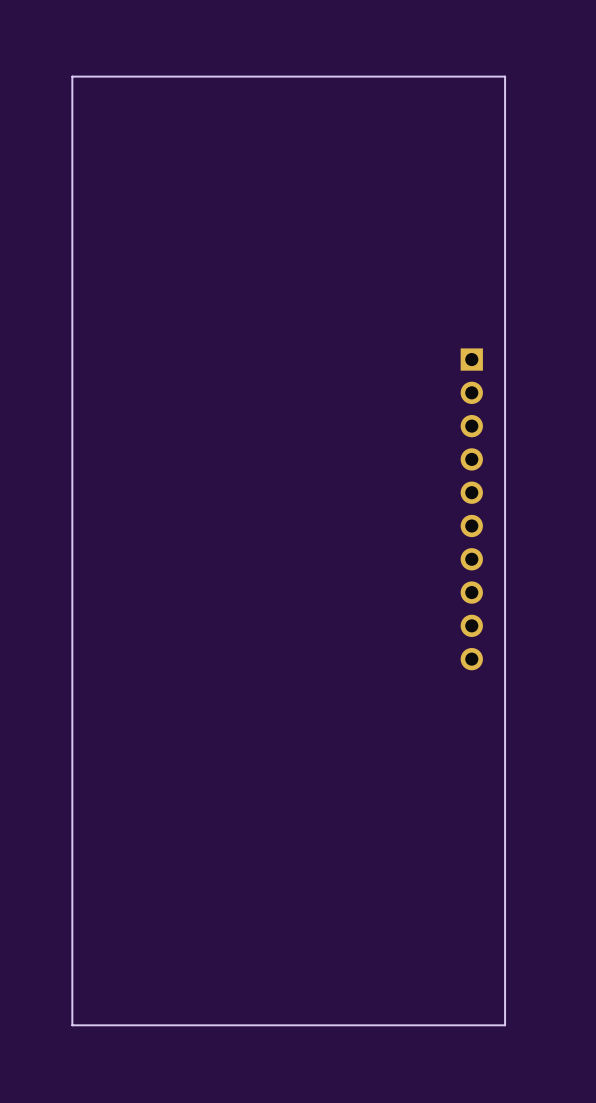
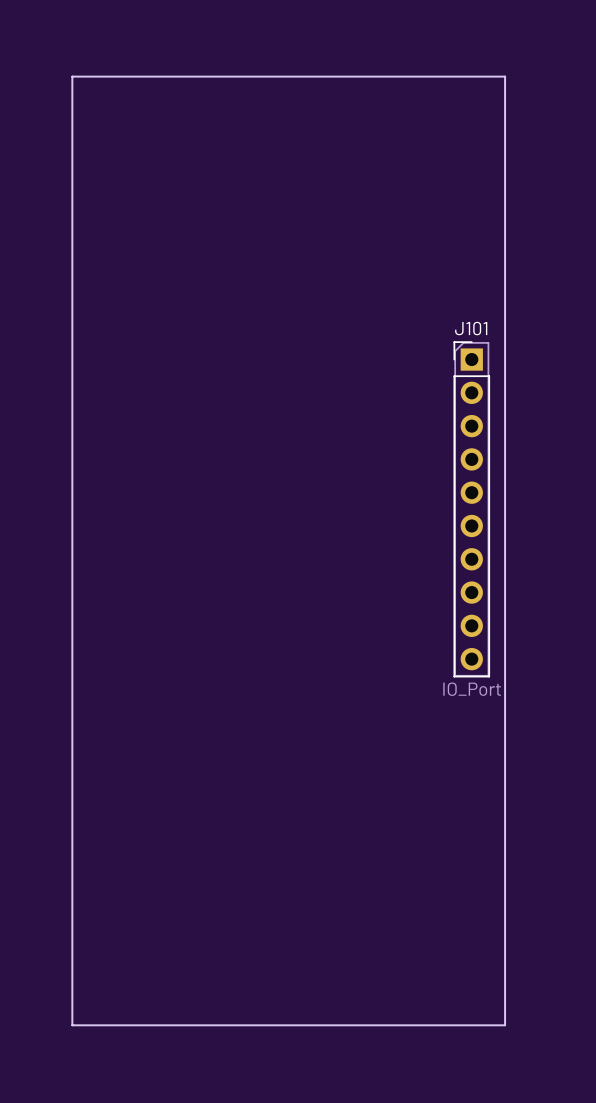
J101 side: bottom (471, 509) -> top (471, 509)

